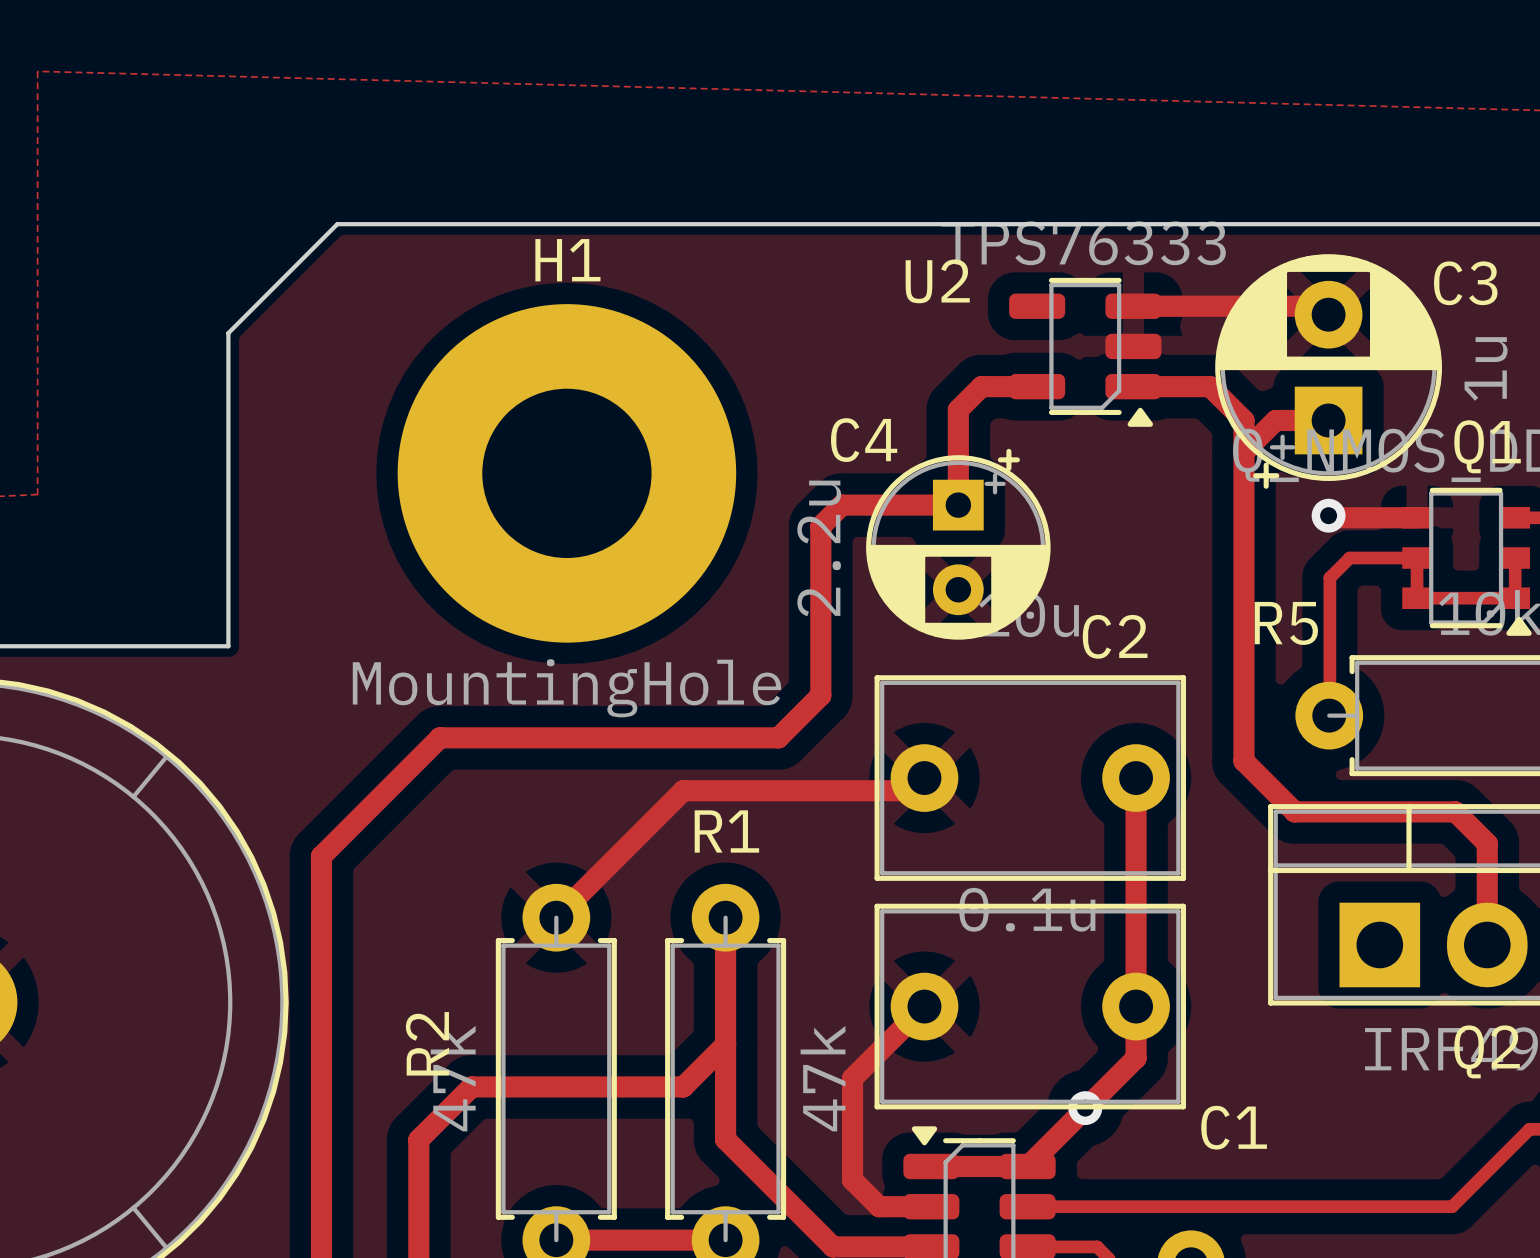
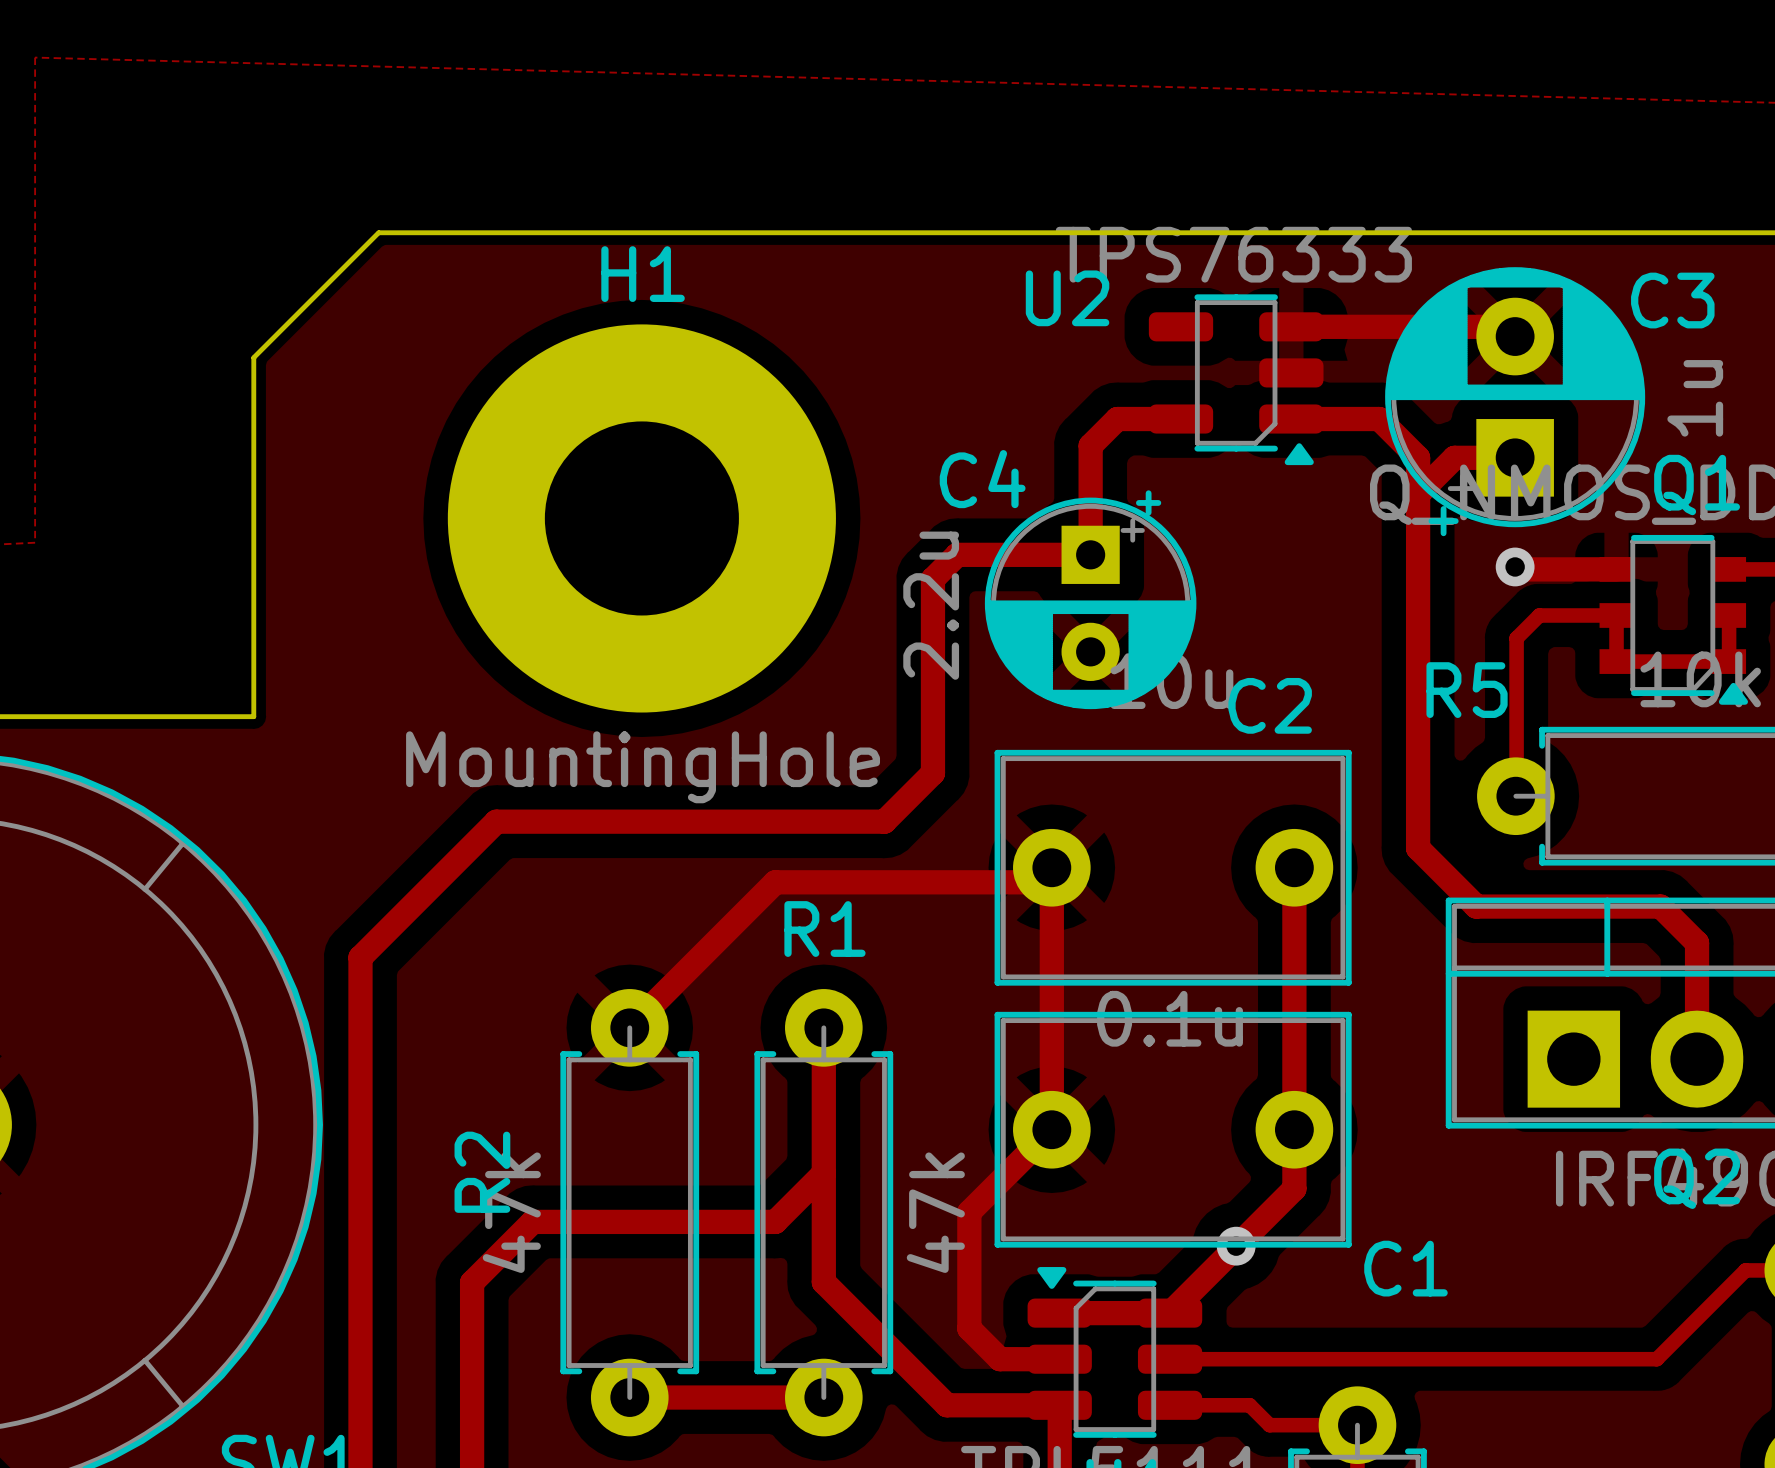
track: none -> (1051, 867) (1051, 1129)

